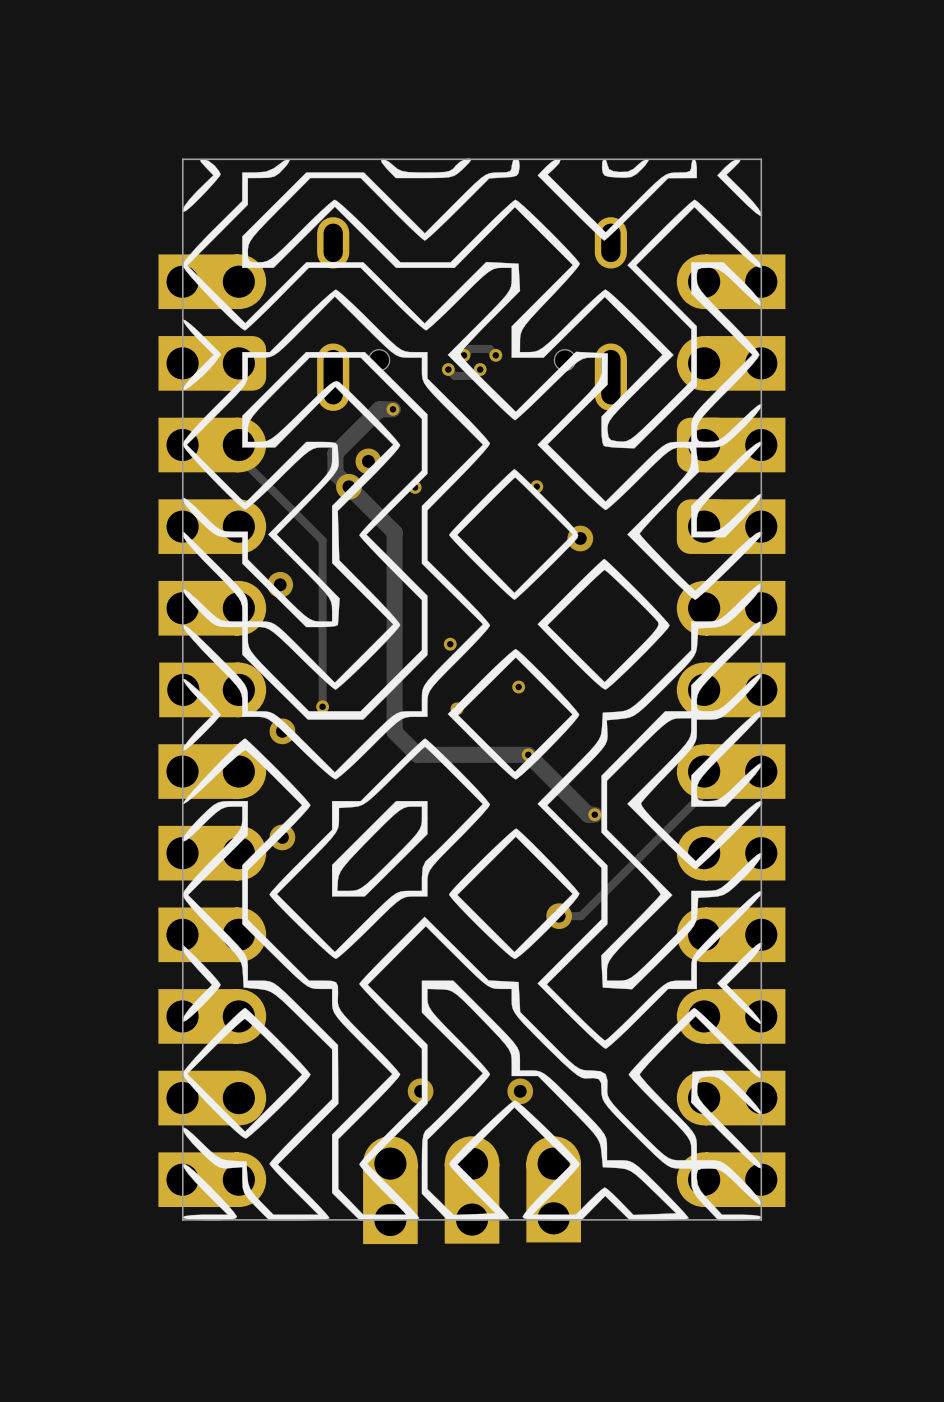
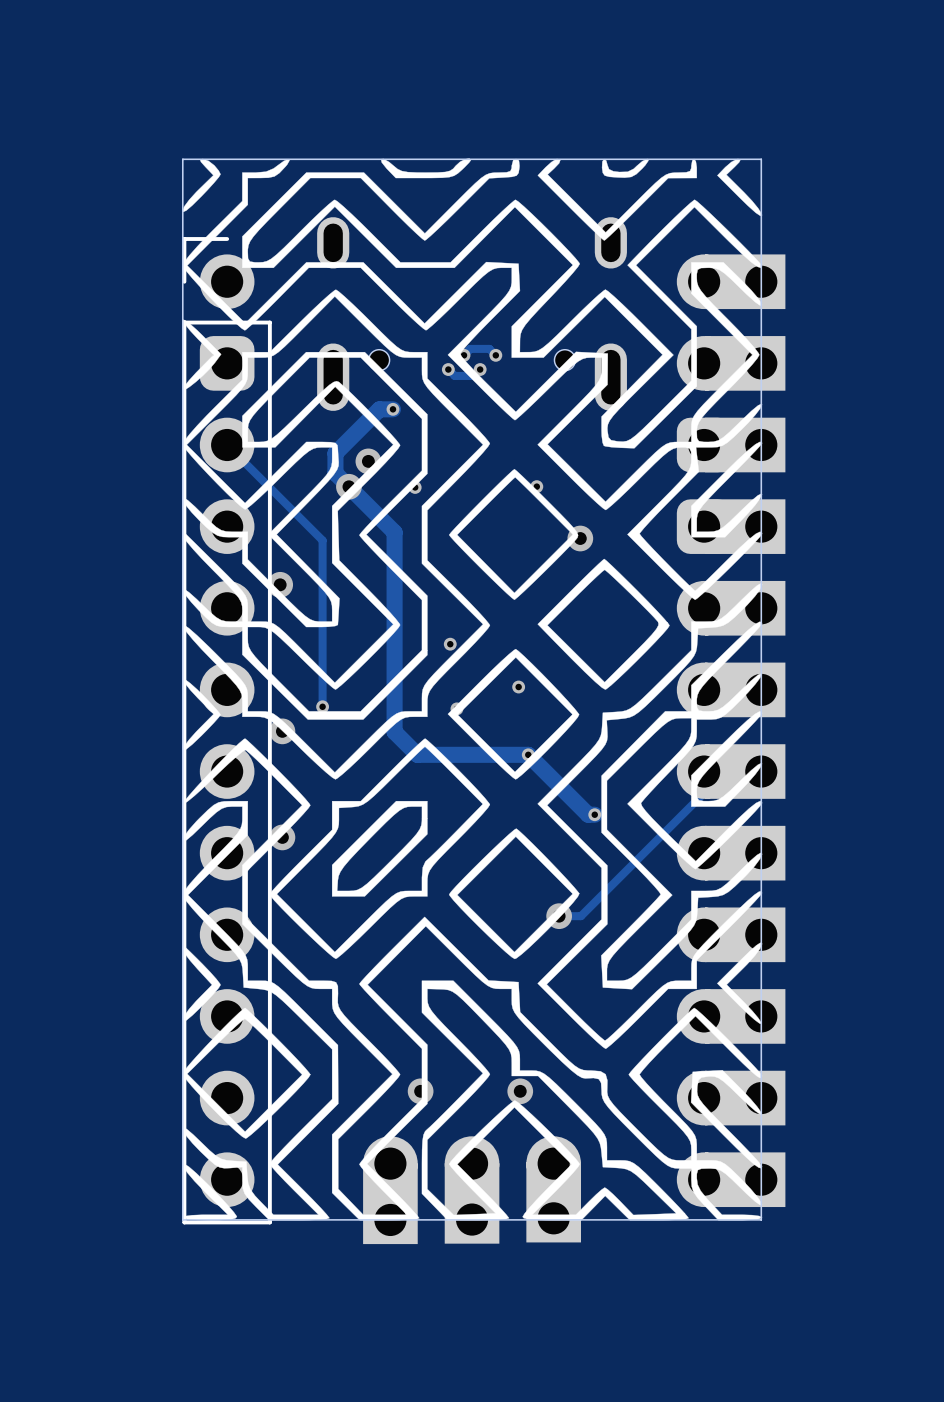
part footprint: [158, 254, 267, 1208] -> [182, 237, 272, 1225]

